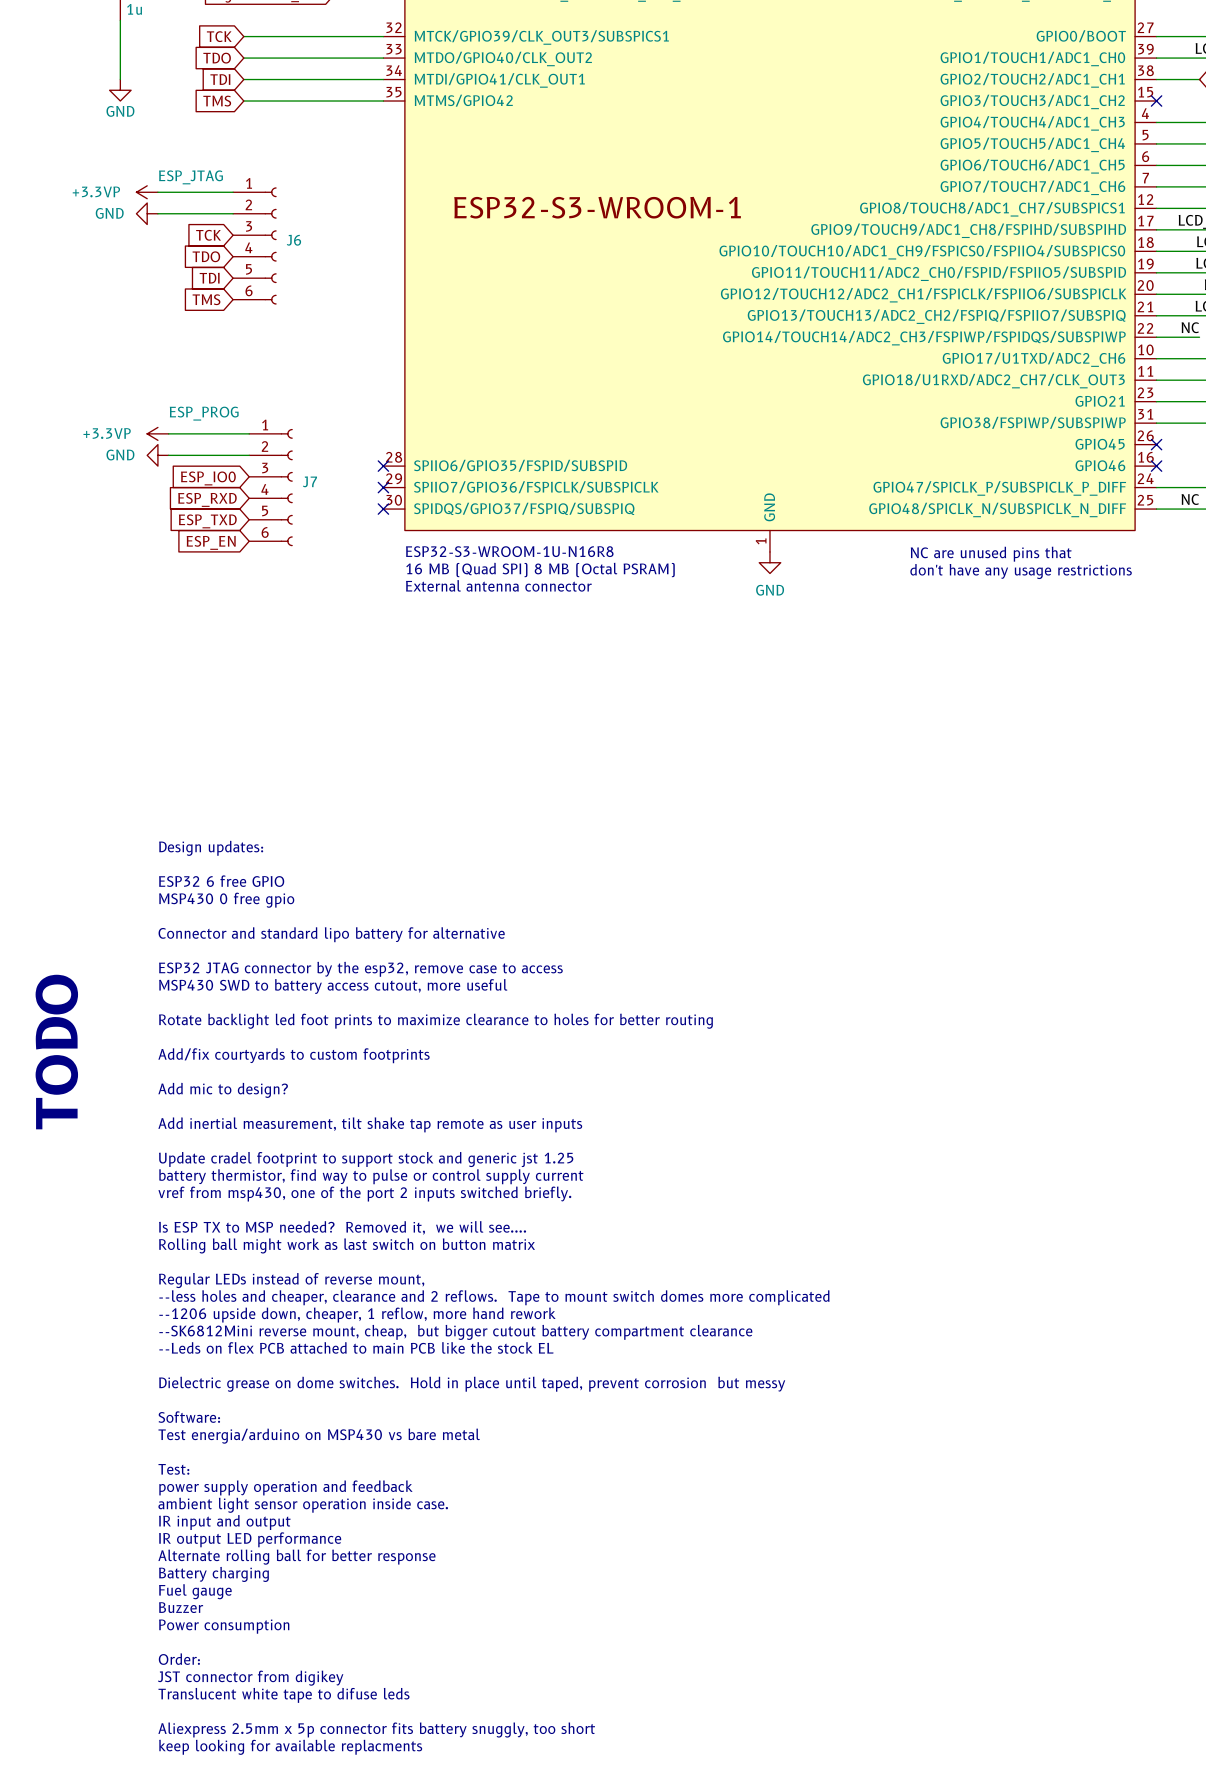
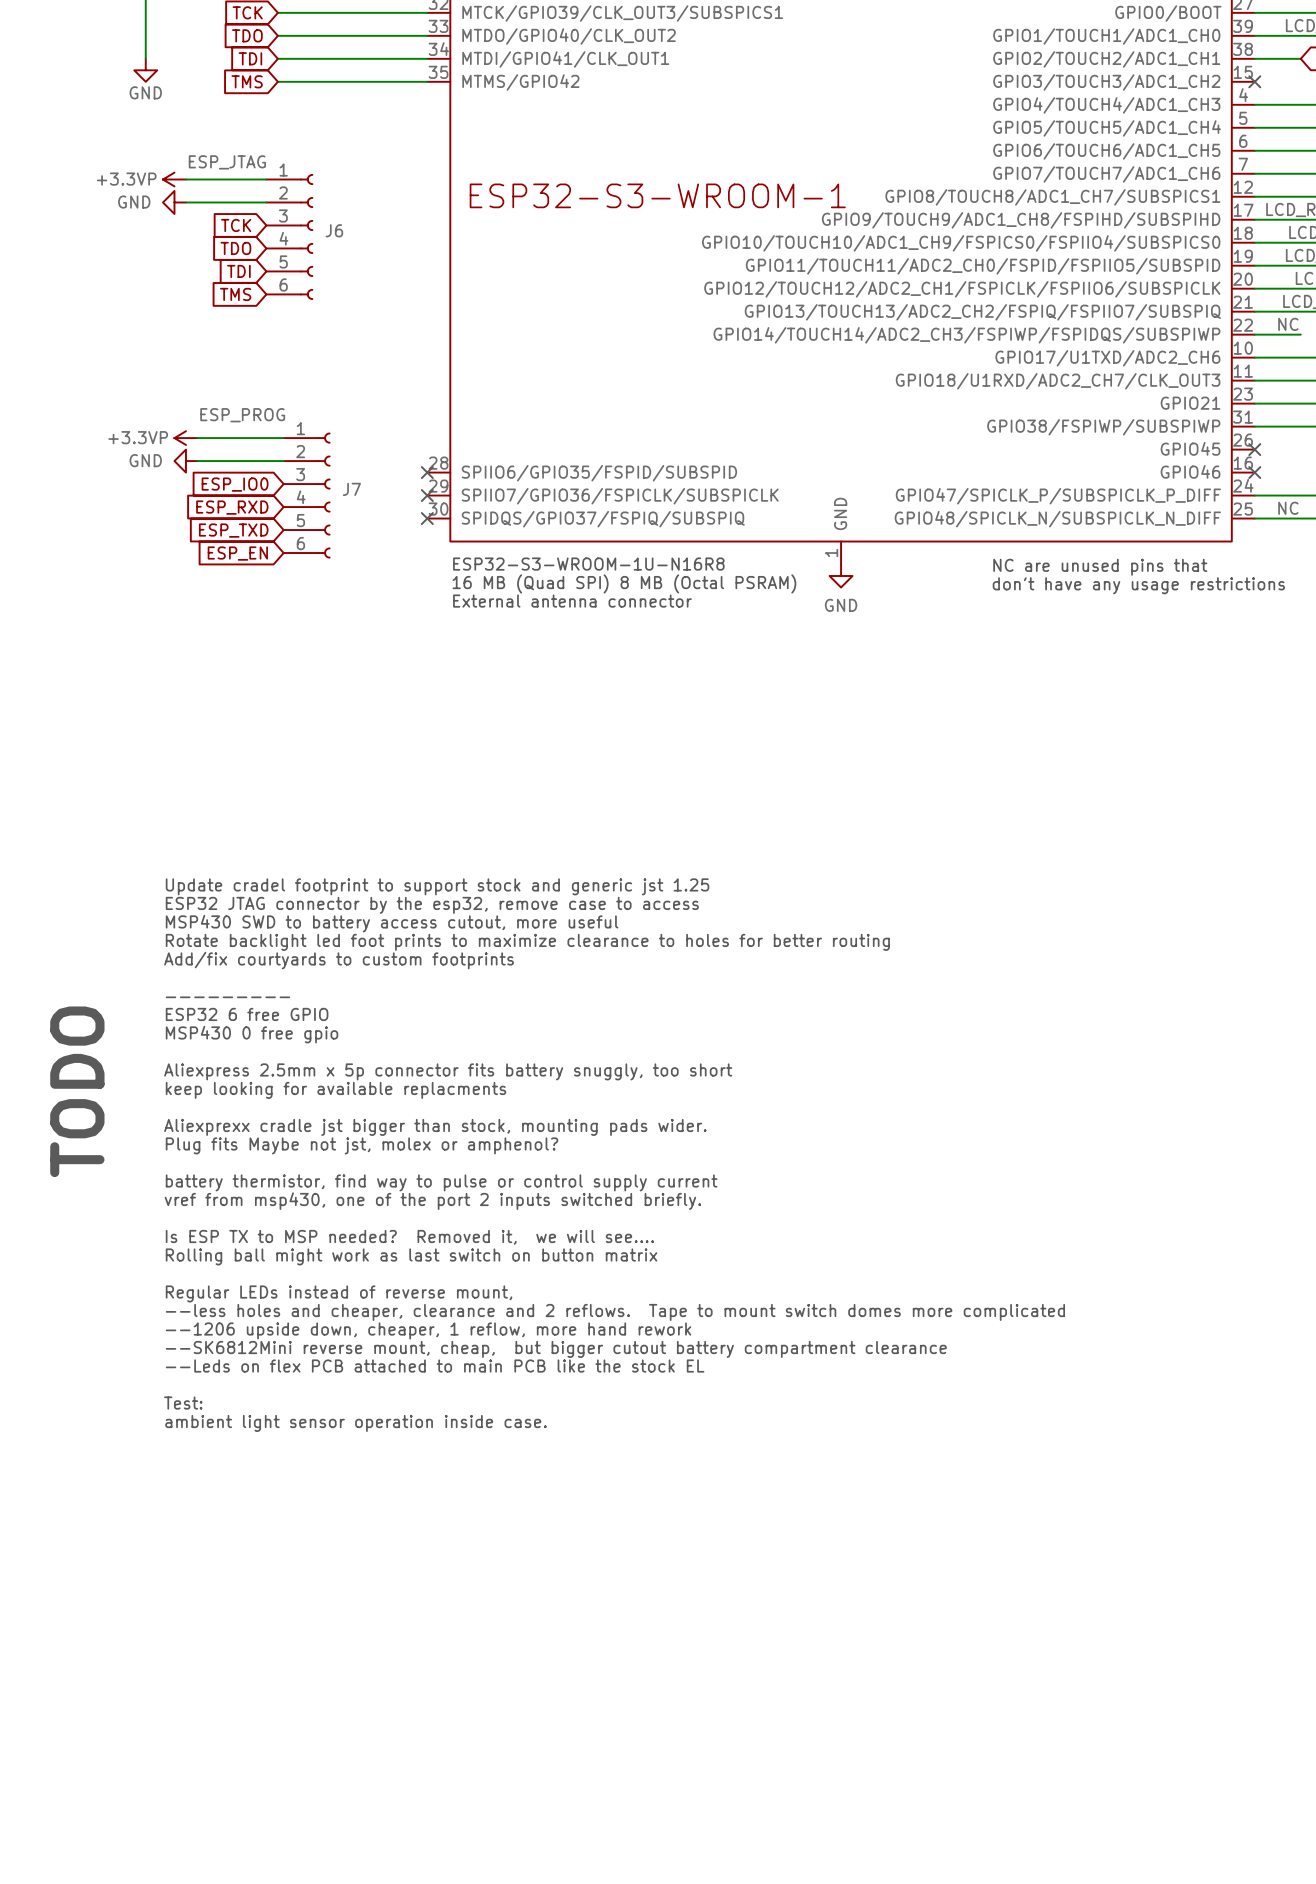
text: Design updates: (211, 848) -> none
text: none -> Update cradel footprint to support stock and generic jst 1.25 (437, 886)
text position: ESP32 6 free GPIO (221, 881) -> ESP32 6 free GPIO (247, 1014)
text position: MSP430 0 free gpio (226, 900) -> MSP430 0 free gpio (252, 1034)
text: Connector and standard lipo battery for alternative (331, 934) -> none
text: none -> --------- (227, 997)
text position: ESP32 JTAG connector by the esp32, remove case to access (360, 969) -> ESP32 JTAG connector by the esp32, remove case to access (432, 905)
text position: MSP430 SWD to battery access cutout, more useful (333, 986) -> MSP430 SWD to battery access cutout, more useful (392, 923)
text position: Rotate backlight led foot prints to maximize clearance to holes for better routing (435, 1021) -> Rotate backlight led foot prints to maximize clearance to holes for better routing (527, 942)
text: none -> Aliexpress 2.5mm x 5p connector fits battery snuggly, too short (448, 1071)
text: none -> keep looking for available replacments (336, 1090)
text position: Add/fix courtyards to custom footprints (293, 1055) -> Add/fix courtyards to custom footprints (339, 960)
text: none -> Aliexprexx cradle jst bigger than stock, mounting pads wider. (435, 1127)
text: Add mic to design? (223, 1090) -> none
text: none -> Plug fits Maybe not jst, molex or amphenol? (362, 1145)
text: Add inertial measurement, tilt shake tap remote as user inputs (370, 1124) -> none
text: Update cradel footprint to support stock and generic jst 1.25 (366, 1159) -> none
text position: battery thermistor, find way to pulse or control supply current (371, 1176) -> battery thermistor, find way to pulse or control supply current (441, 1182)
text position: vref from msp430, one of the port 2 inputs switched briefly. (364, 1194) -> vref from msp430, one of the port 2 inputs switched briefly. (432, 1201)
text position: Is ESP TX to MSP needed? Removed it, we will see.... (342, 1227) -> Is ESP TX to MSP needed? Removed it, we will see.... (409, 1237)
text position: Rolling ball might work as last switch on button matrix (347, 1245) -> Rolling ball might work as last switch on button matrix (411, 1256)
text position: Regular LEDs instead of reverse mount, (291, 1280) -> Regular LEDs instead of reverse mount, (339, 1293)
text position: --less holes and cheaper, clearance and 2 reflows. Tape to mount switch domes more complicated (494, 1297) -> --less holes and cheaper, clearance and 2 reflows. Tape to mount switch domes more complicated (615, 1312)
text position: --1206 upside down, cheaper, 1 reflow, more hand rework (357, 1315) -> --1206 upside down, cheaper, 1 reflow, more hand rework (428, 1330)
text position: --SK6812Mini reverse mount, cheap, but bigger cutout battery compartment clearance (455, 1332) -> --SK6812Mini reverse mount, cheap, but bigger cutout battery compartment clearance (556, 1349)
text position: --Leds on flex PCB attached to main PCB like the stock EL (356, 1347) -> --Leds on flex PCB attached to main PCB like the stock EL (435, 1366)
text: Dielectric grease on dome switches. Hold in place until taped, prevent corrosion but messy (472, 1384) -> none
text: Software: (189, 1417) -> none
text: Test energia/arduino on MSP430 vs bare metal (319, 1436) -> none
text position: Test: (173, 1469) -> Test: (183, 1403)
text: power supply operation and feedback (285, 1487) -> none
text position: ambient light sensor operation inside case. (303, 1505) -> ambient light sensor operation inside case. (355, 1423)
text: IR input and output (224, 1522) -> none
text: IR output LED performance (250, 1539) -> none
text: Alternate rolling ball for better response (296, 1557) -> none
text: Battery charging (213, 1574) -> none
text: Fuel gauge (195, 1591) -> none
text: Buzzer (181, 1607) -> none
text: Power consumption (224, 1626) -> none
text: Order: (179, 1659) -> none
text: JST connector from digikey (250, 1678) -> none
text: Translucent white tape to difuse leds (283, 1695) -> none
text: Aliexpress 2.5mm x 5p connector fits battery snuggly, too short (376, 1730) -> none
text: keep looking for available replacments (290, 1747) -> none

